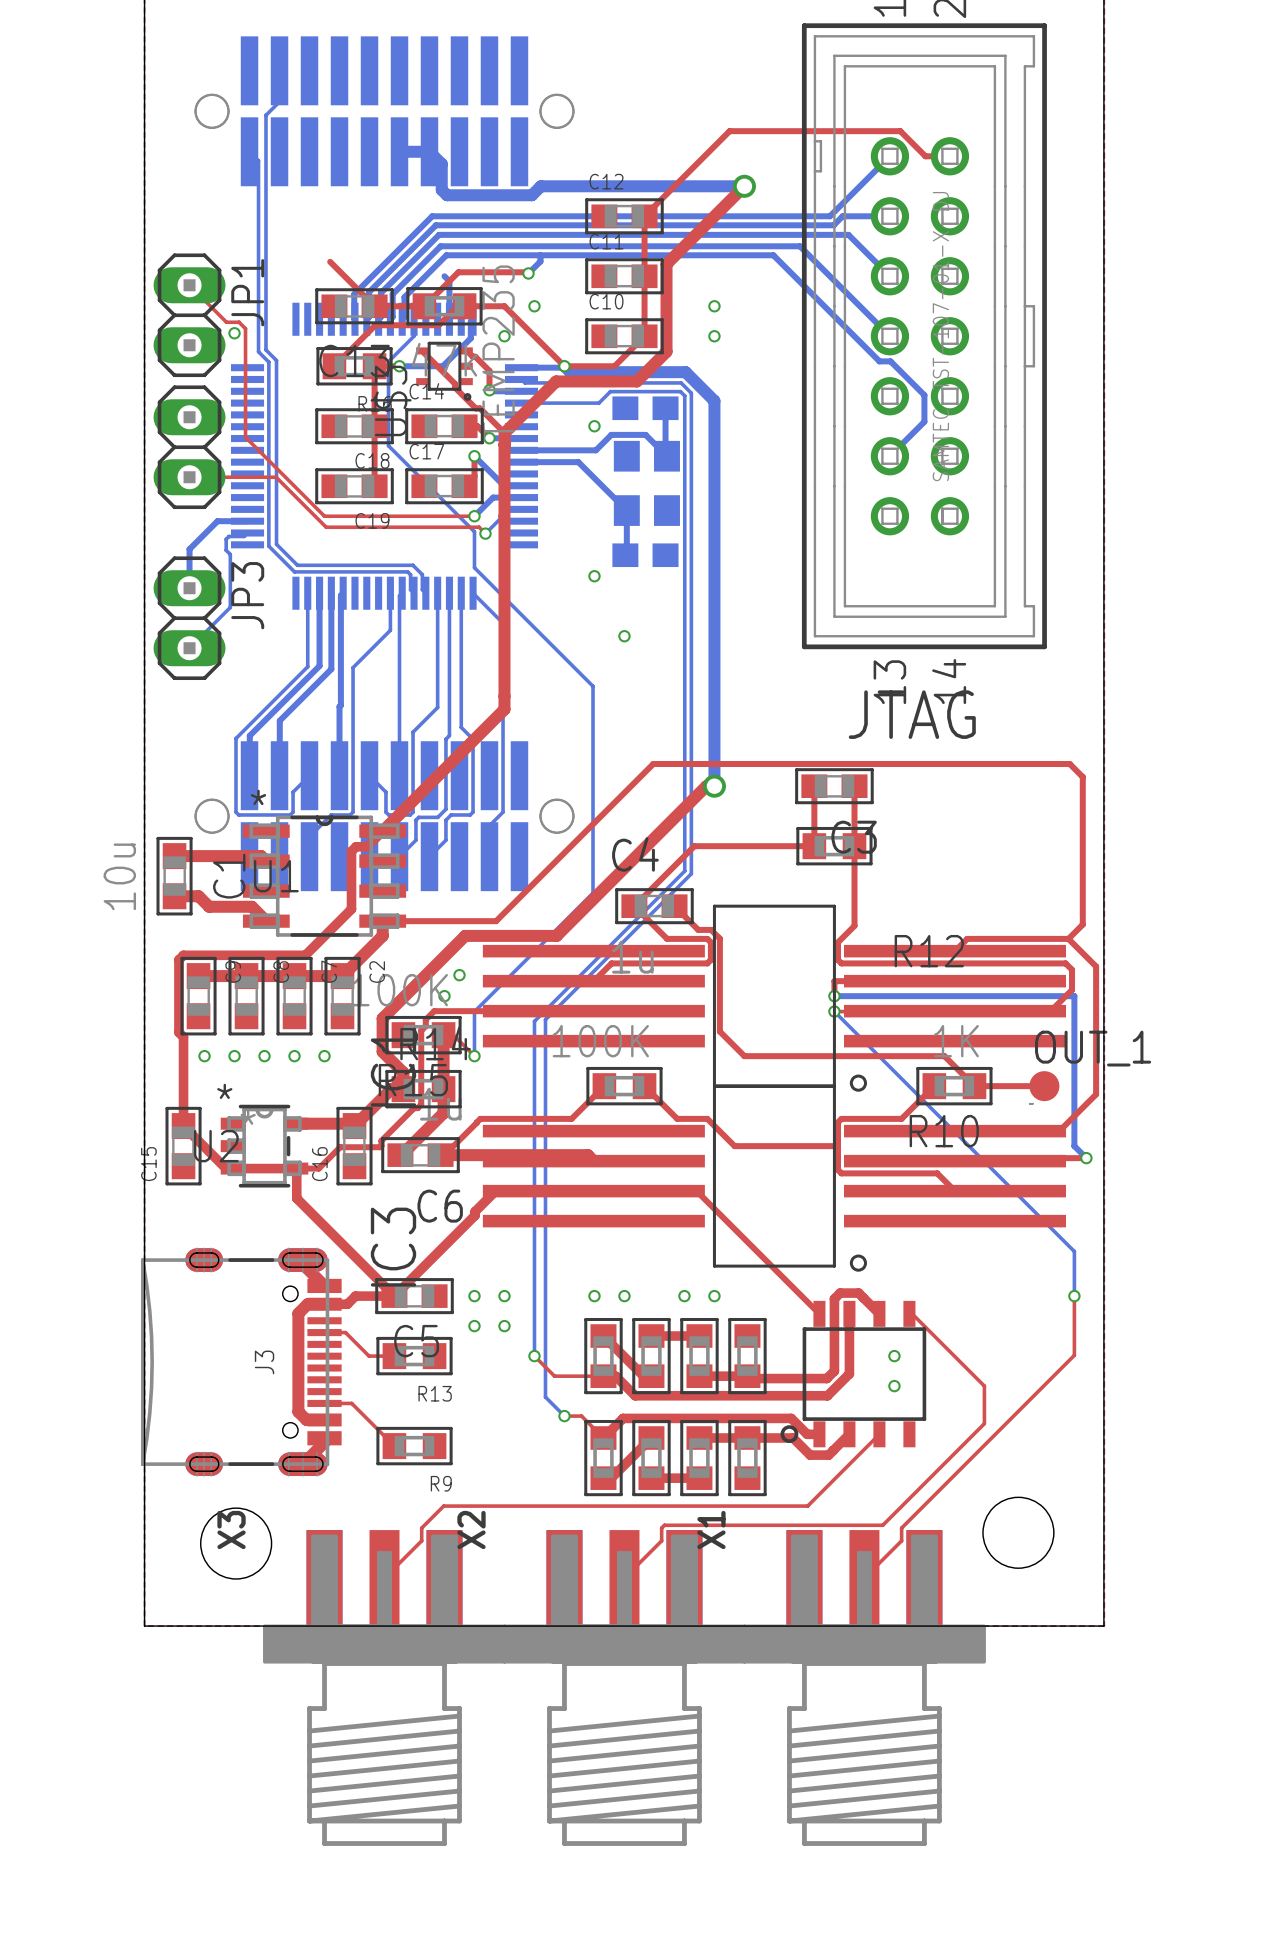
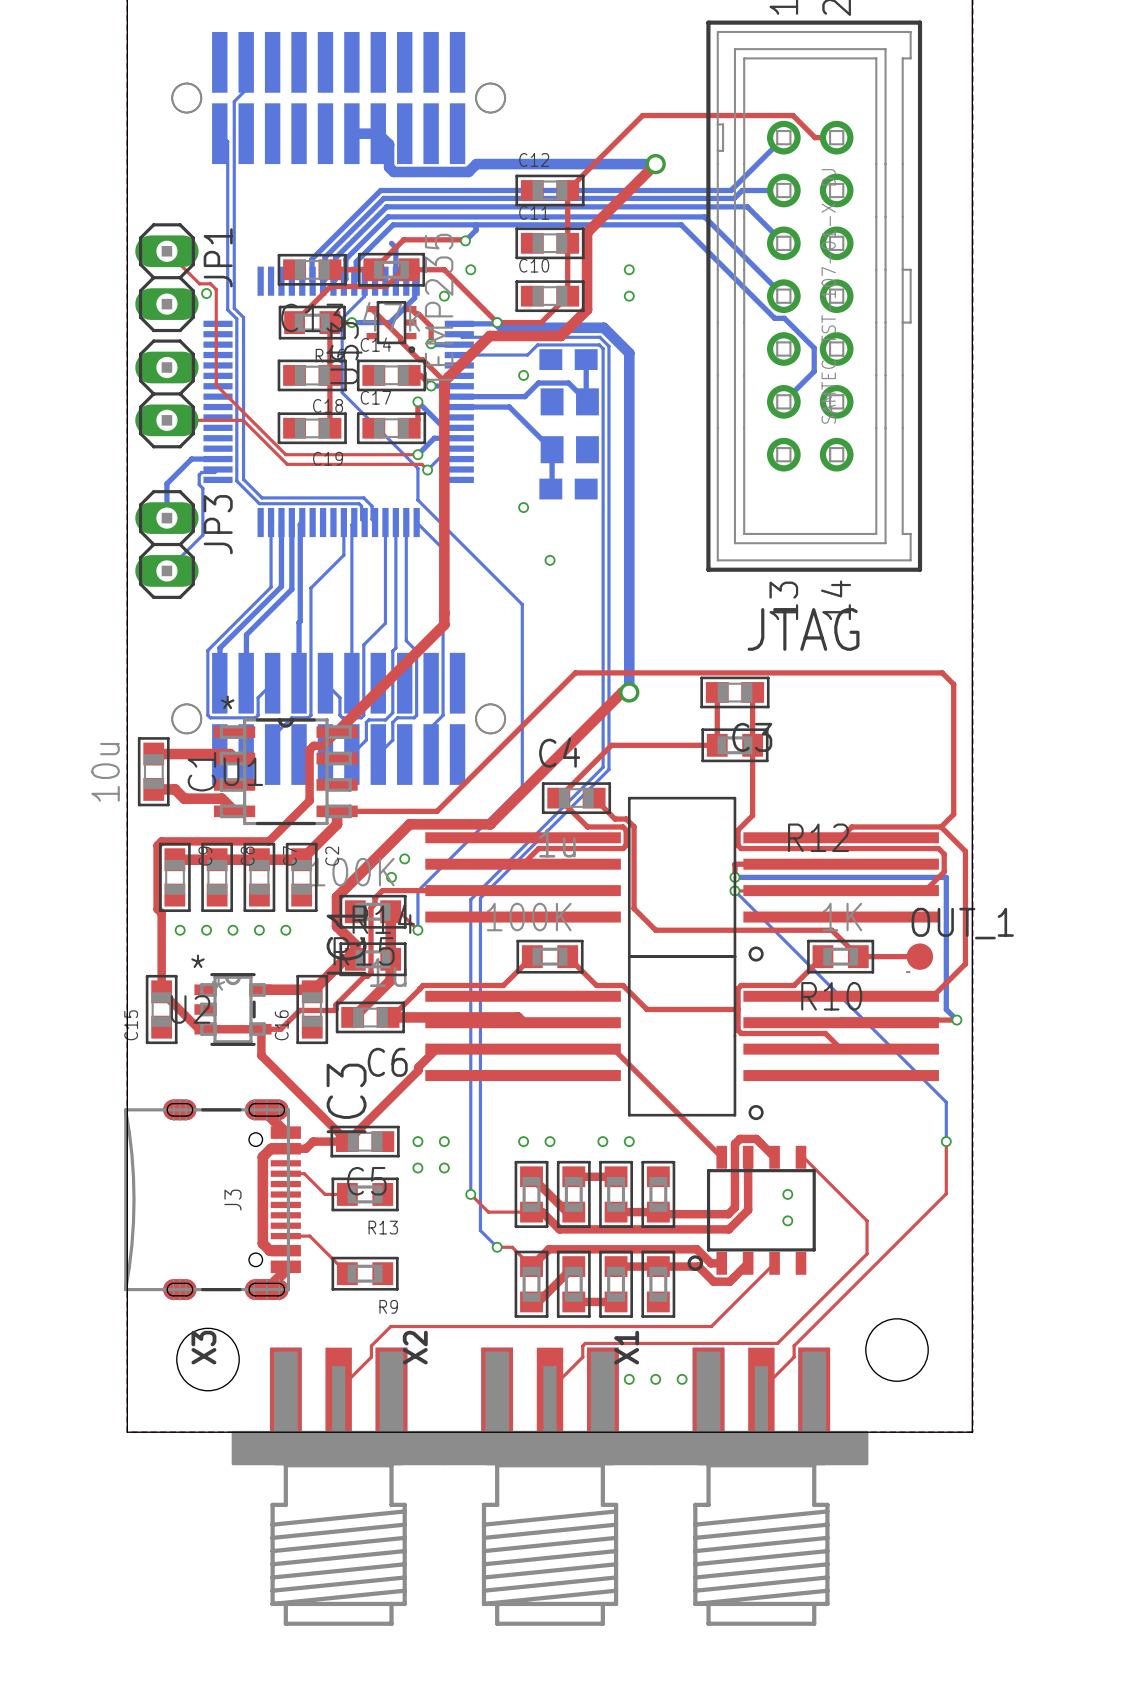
top track: (330, 261) (374, 306) -> none
via: none -> (629, 1379)
via: none -> (655, 1379)
via: none -> (682, 1379)

